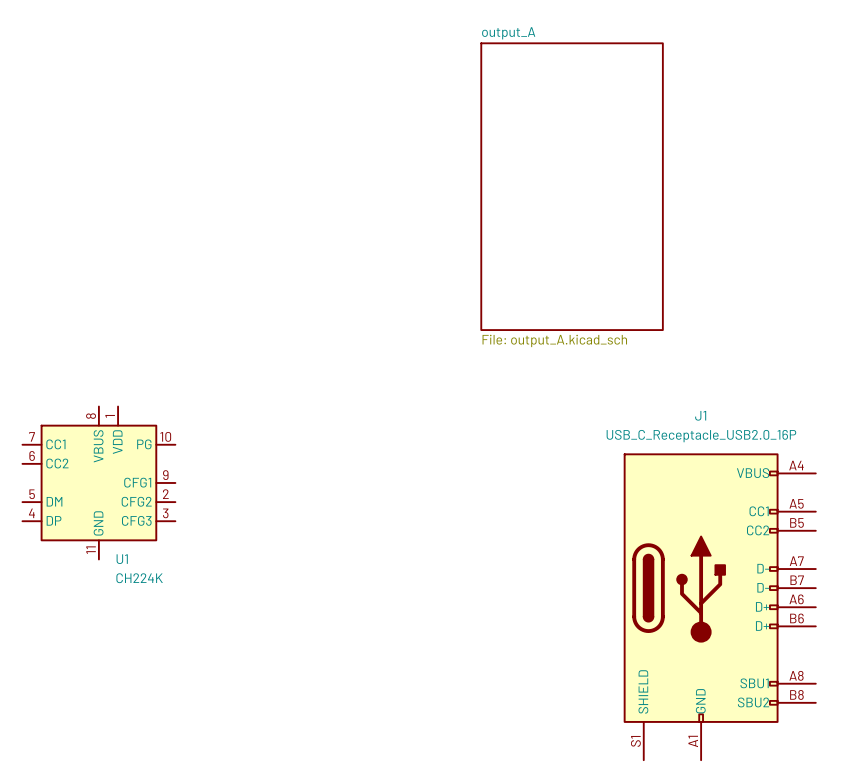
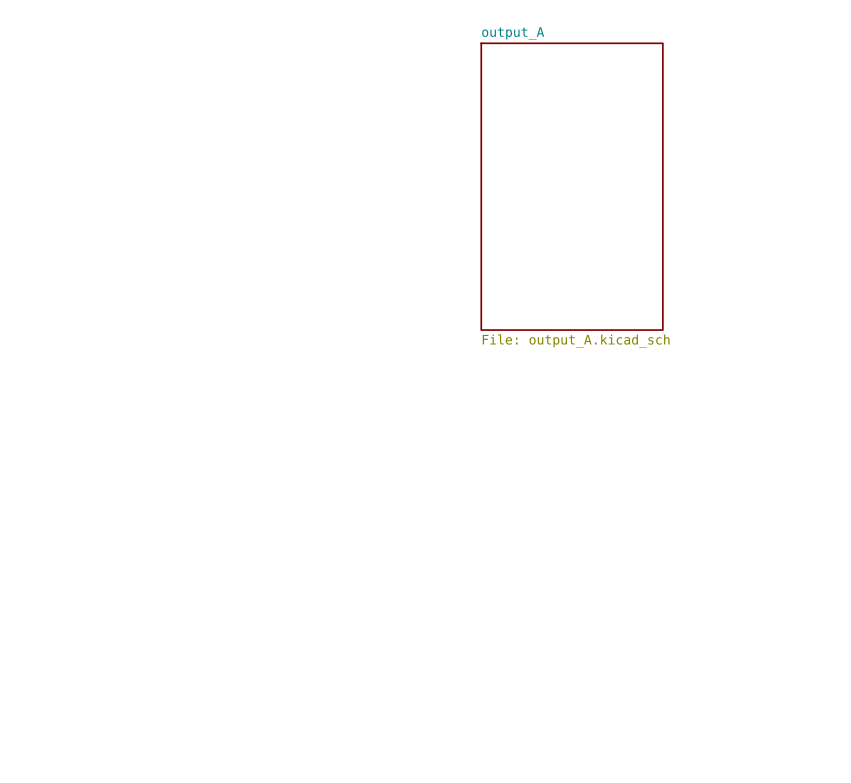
U1: CH224K (98, 482) -> none
J1: USB_C_Receptacle_USB2.0_16P (719, 606) -> none

